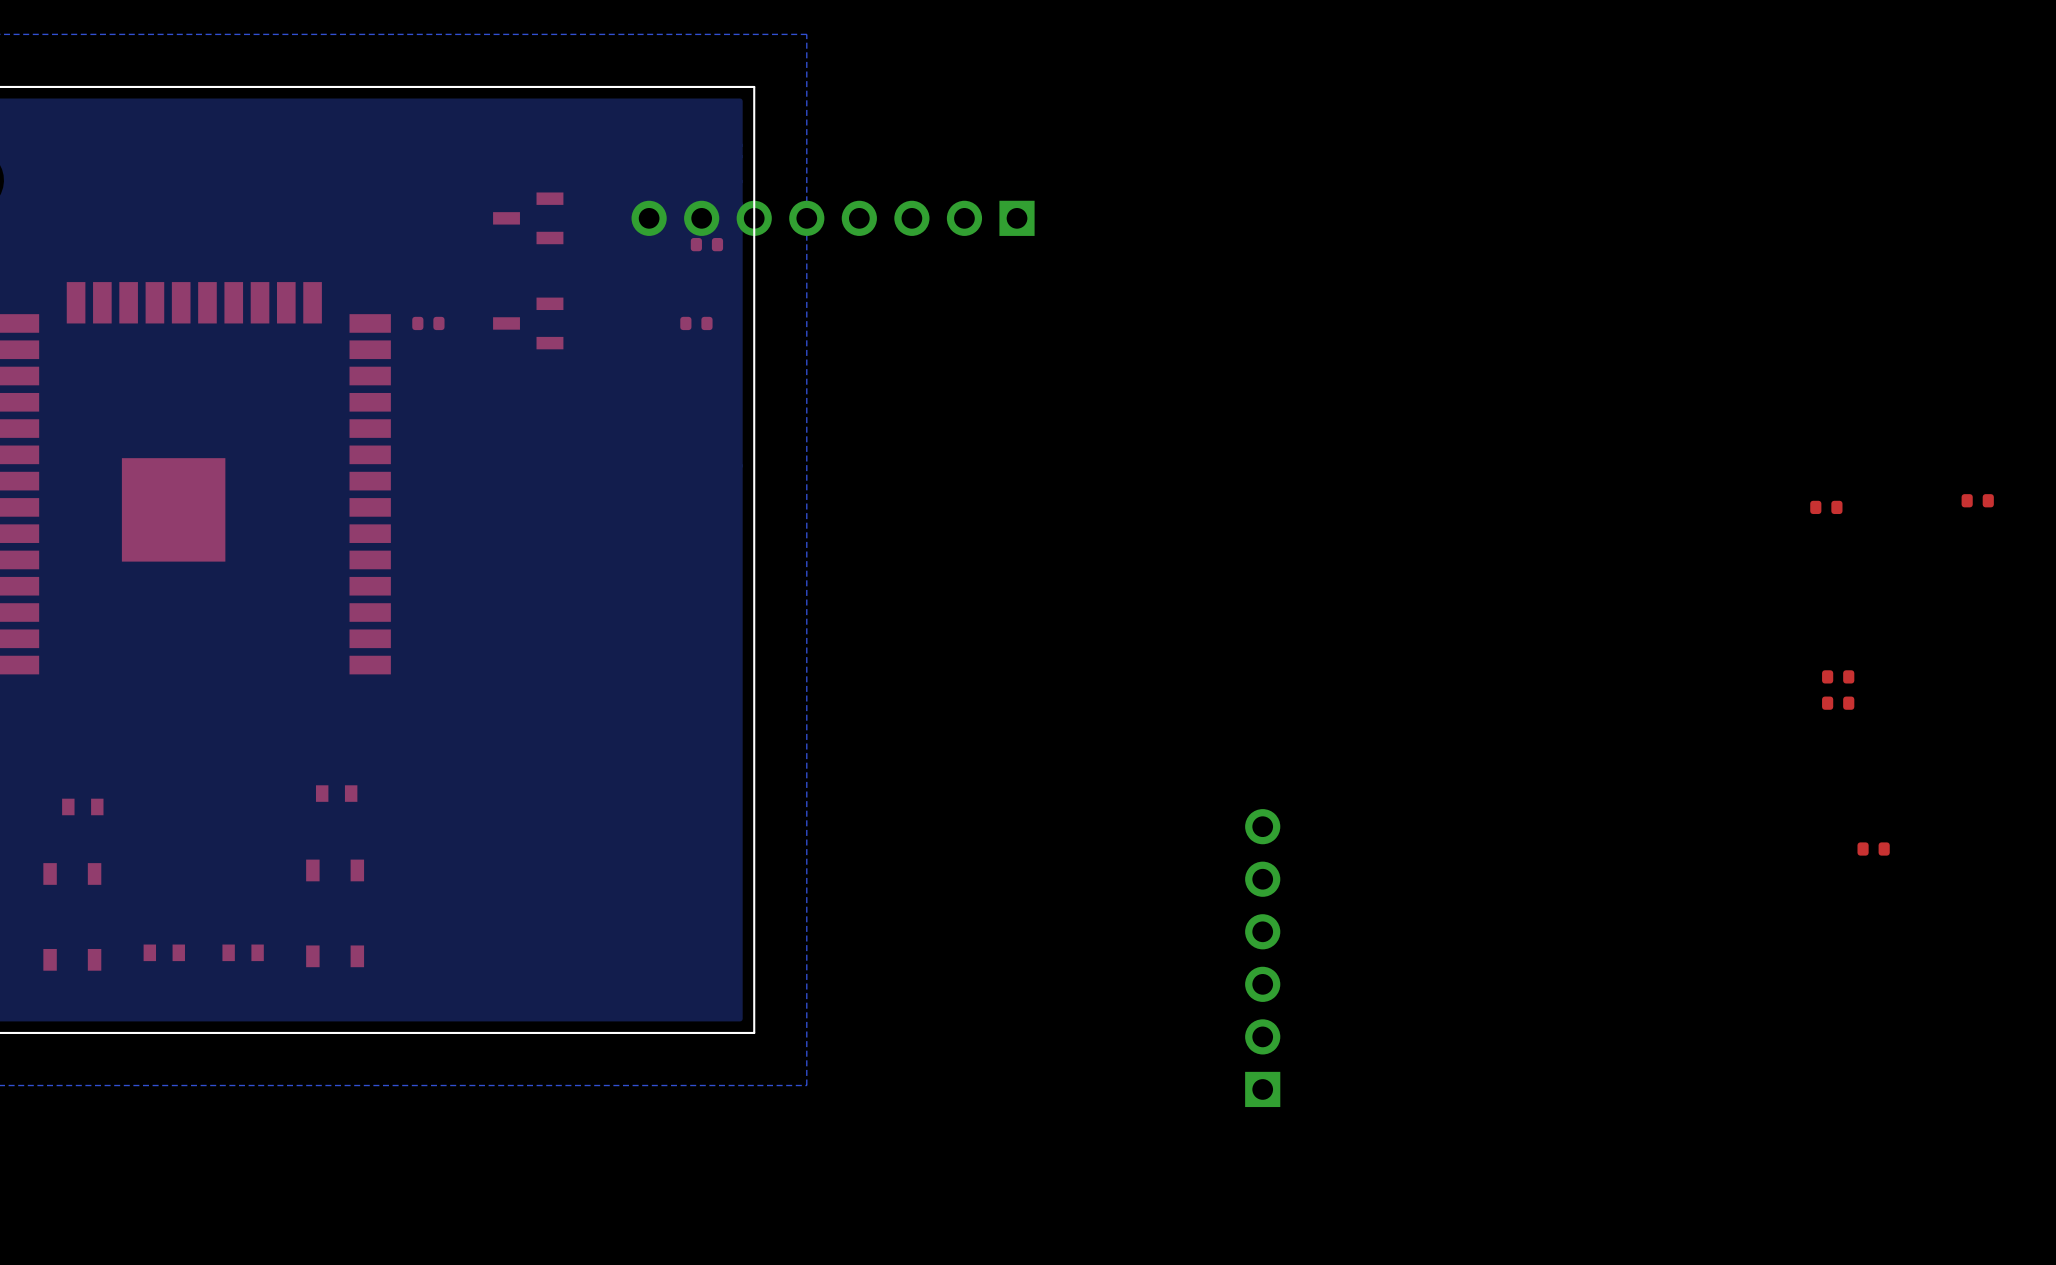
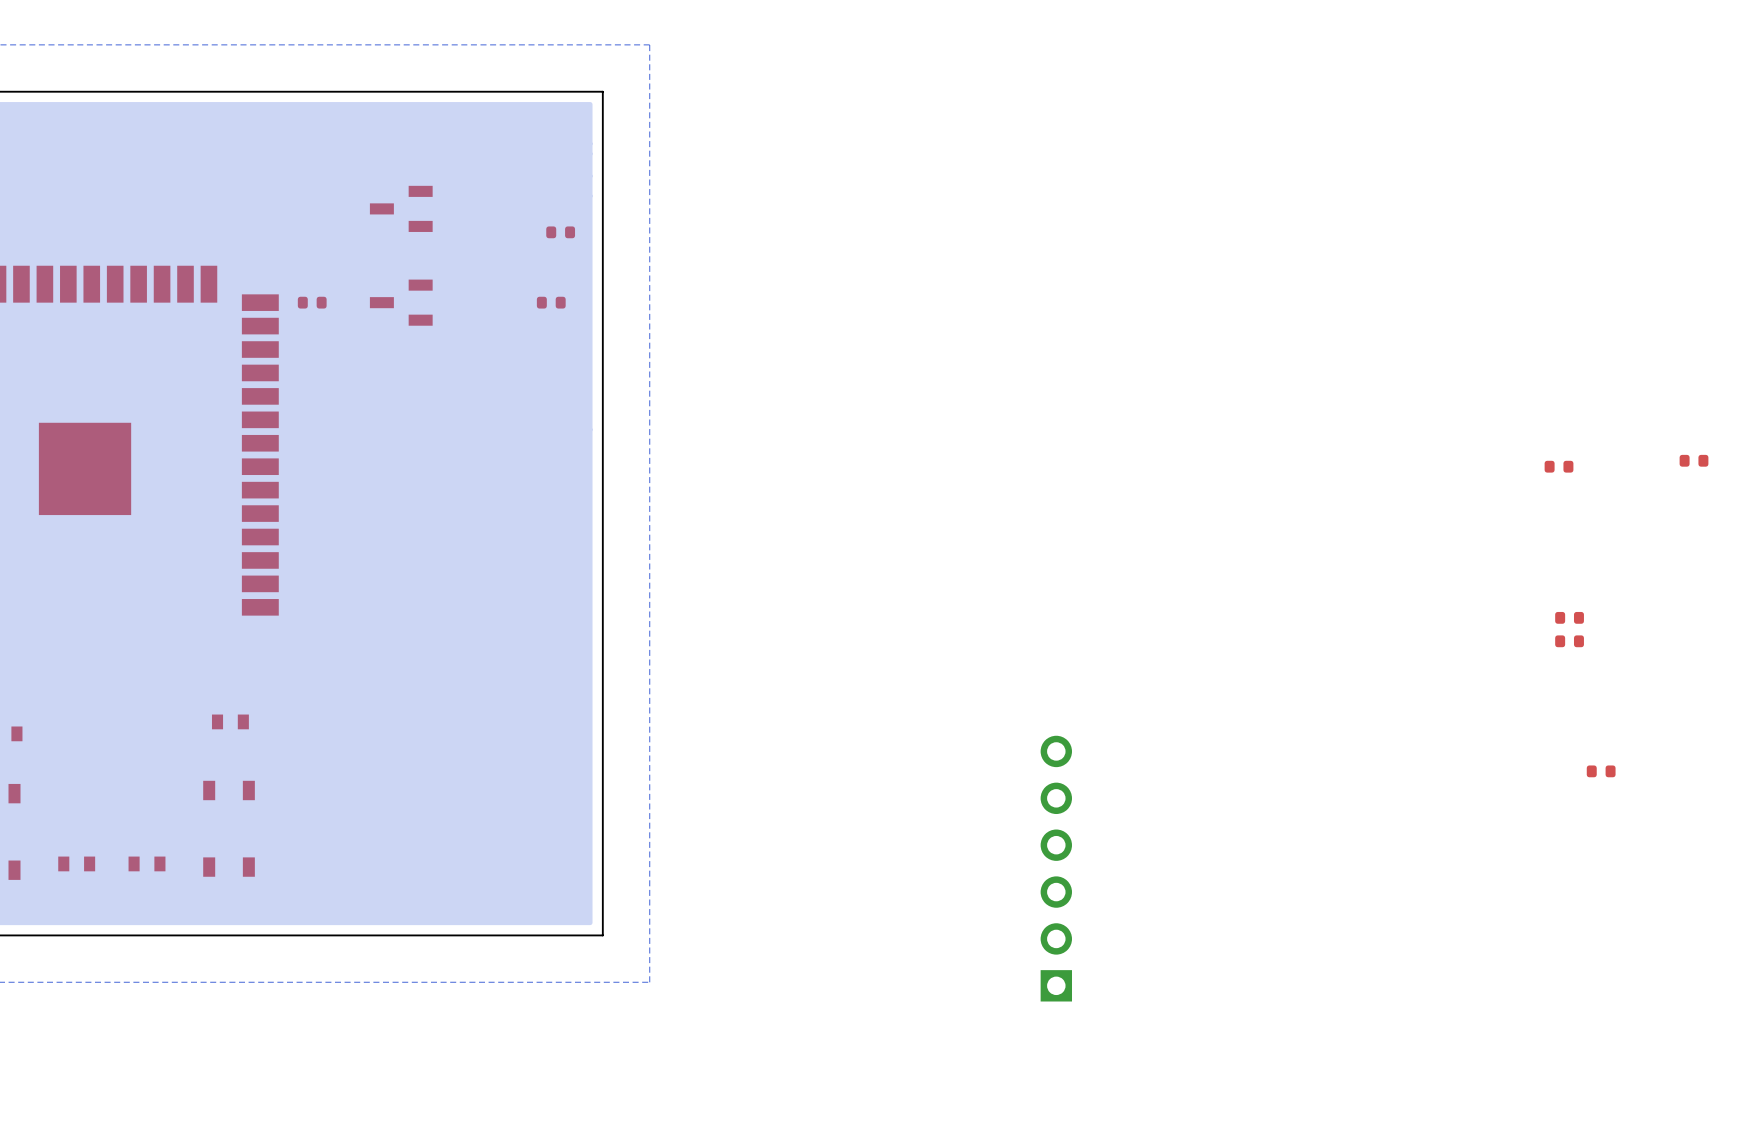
part: (833, 218) -> none

